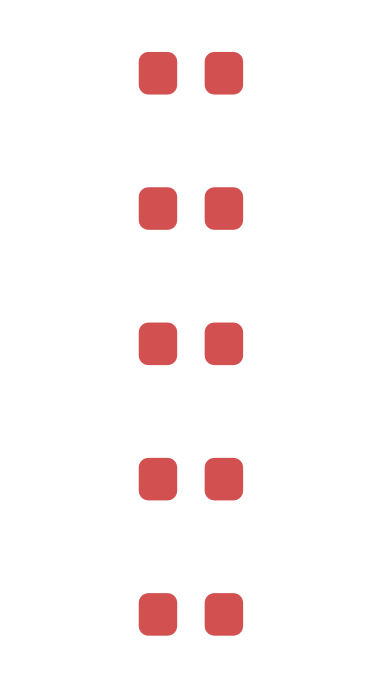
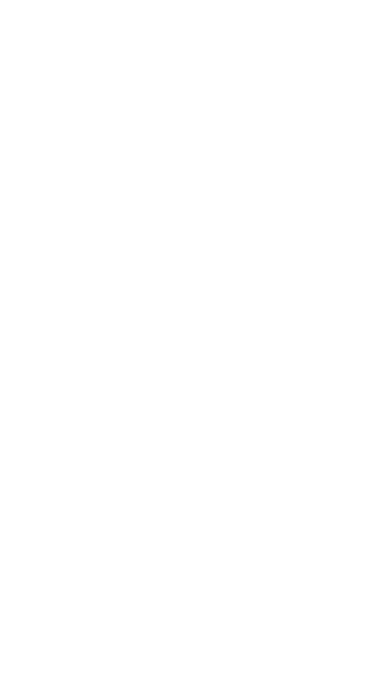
part: (190, 73) -> none
part: (190, 208) -> none
part: (190, 343) -> none
part: (190, 479) -> none
part: (190, 614) -> none

